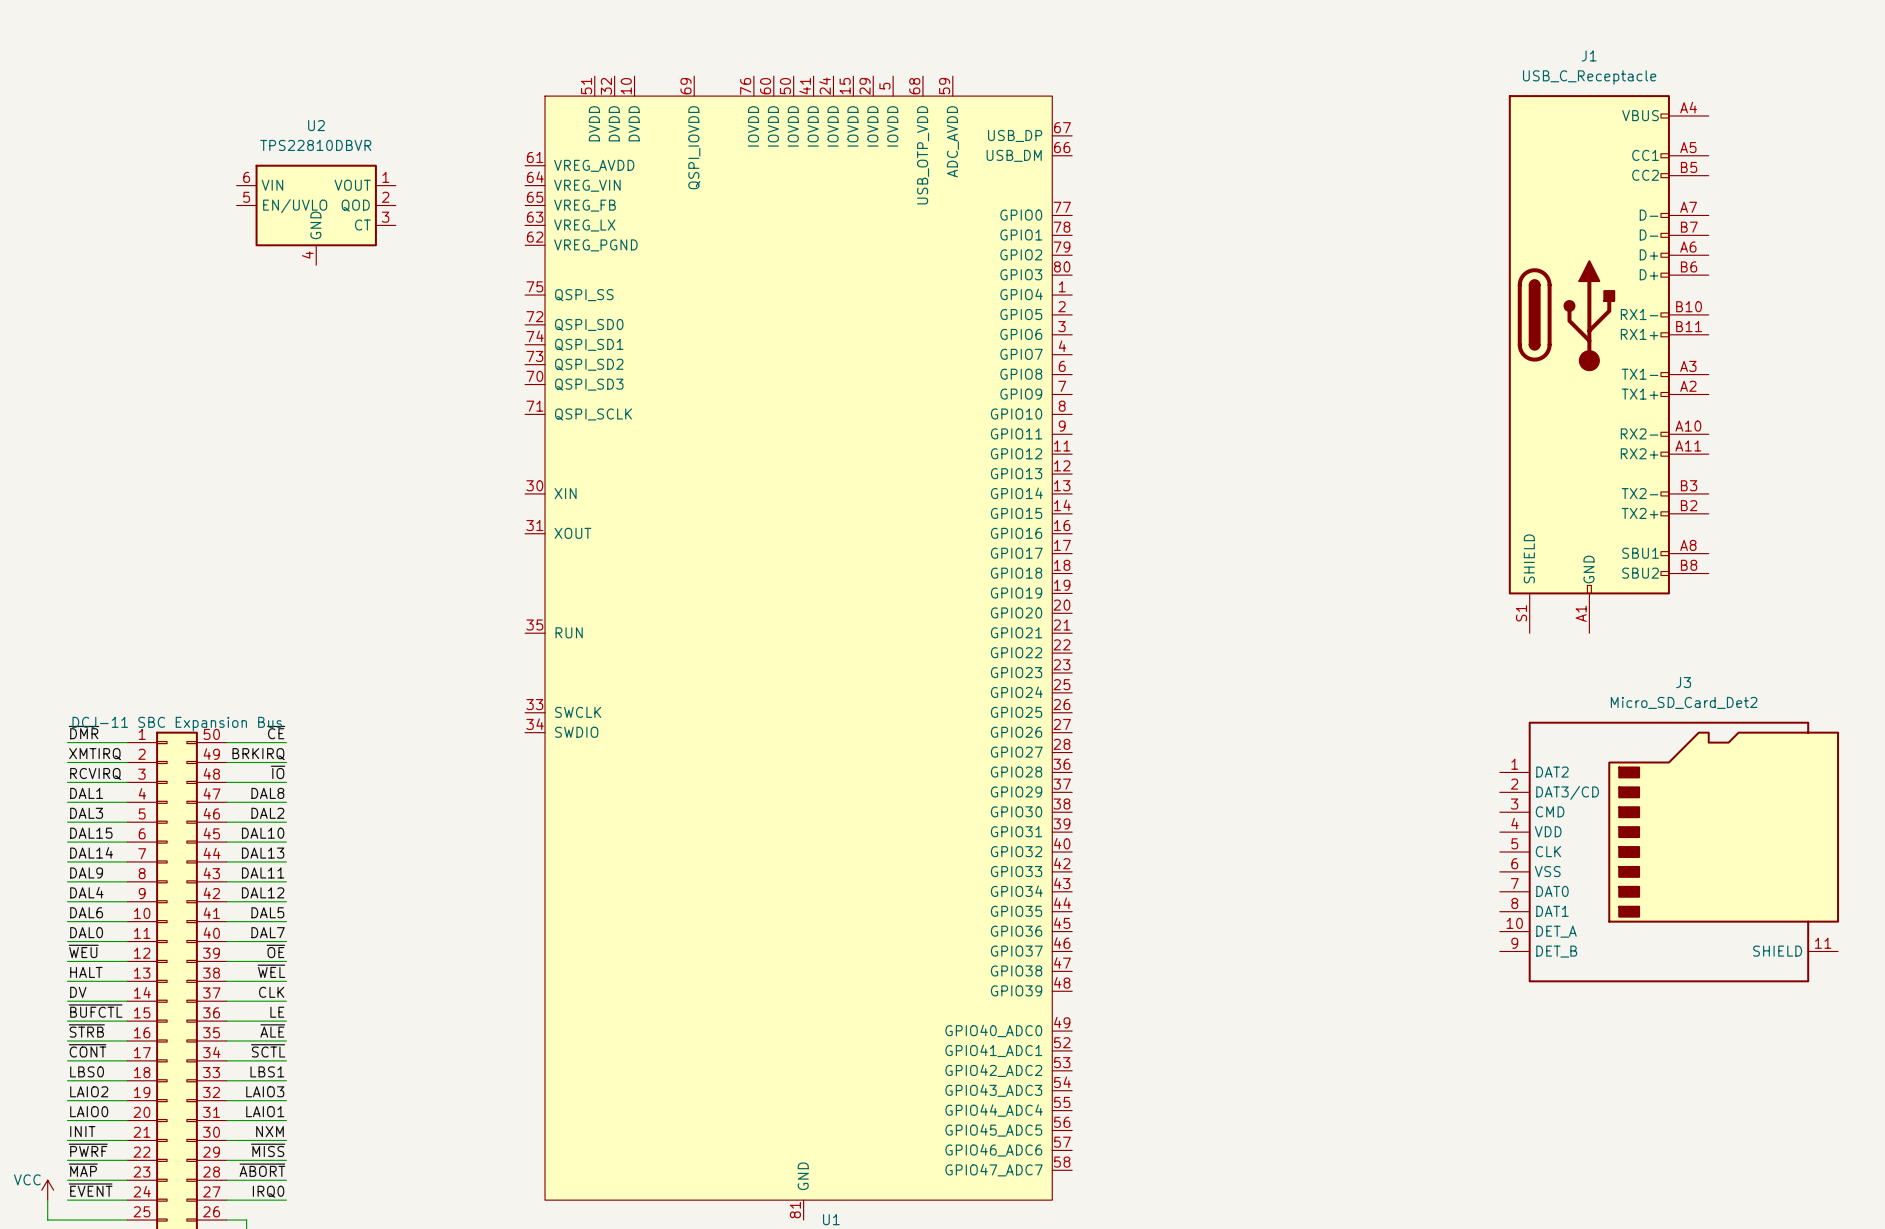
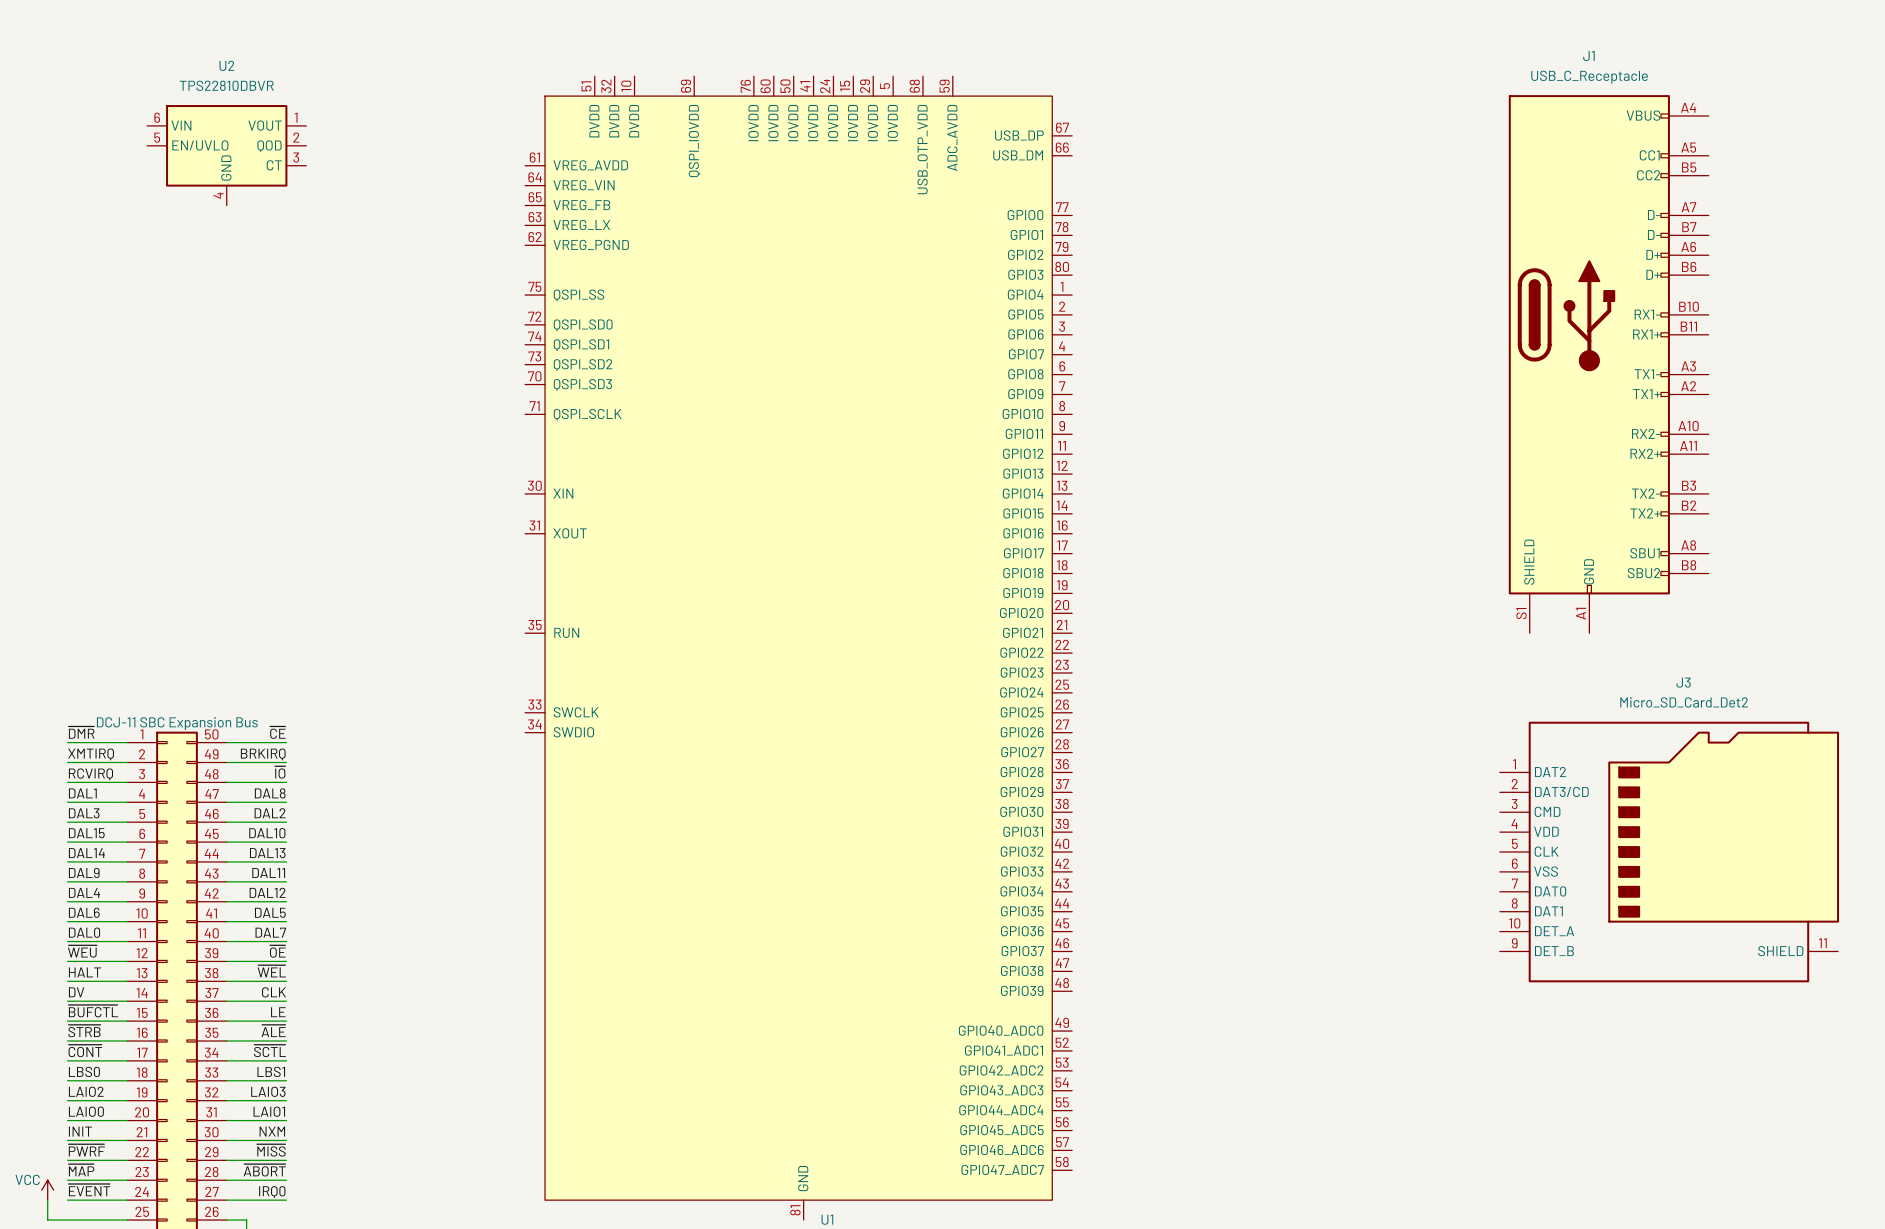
U2 position: (316, 214) -> (226, 155)

